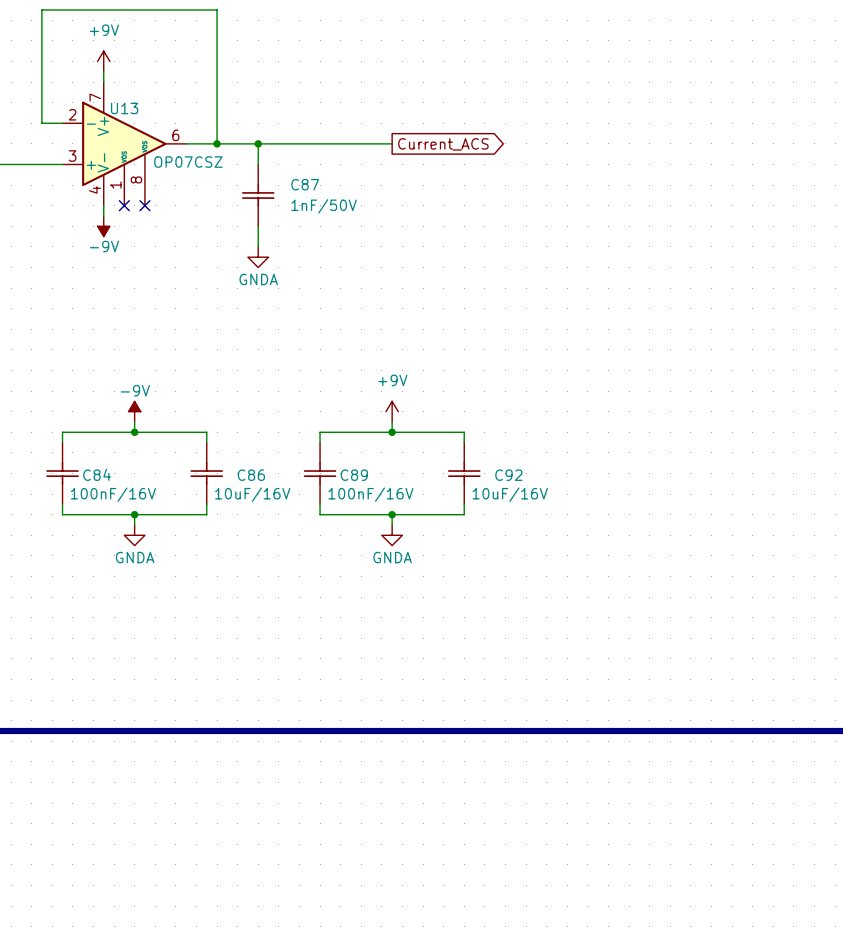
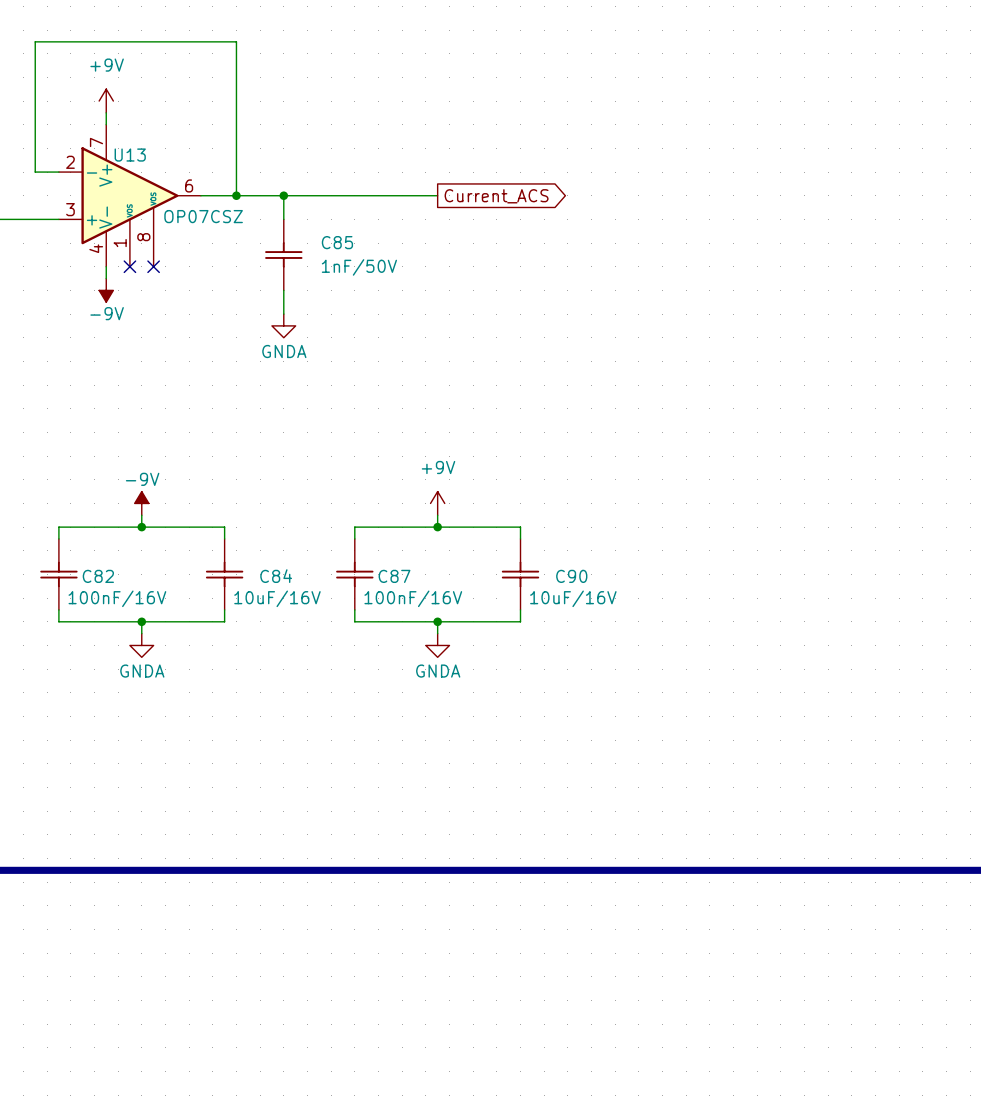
C87 name: C87 (305, 184) -> C85 (337, 242)
C84 name: C84 (97, 474) -> C82 (98, 576)
C86 name: C86 (251, 475) -> C84 (276, 576)
C89 name: C89 (354, 475) -> C87 (394, 576)
C92 name: C92 (508, 475) -> C90 (571, 576)

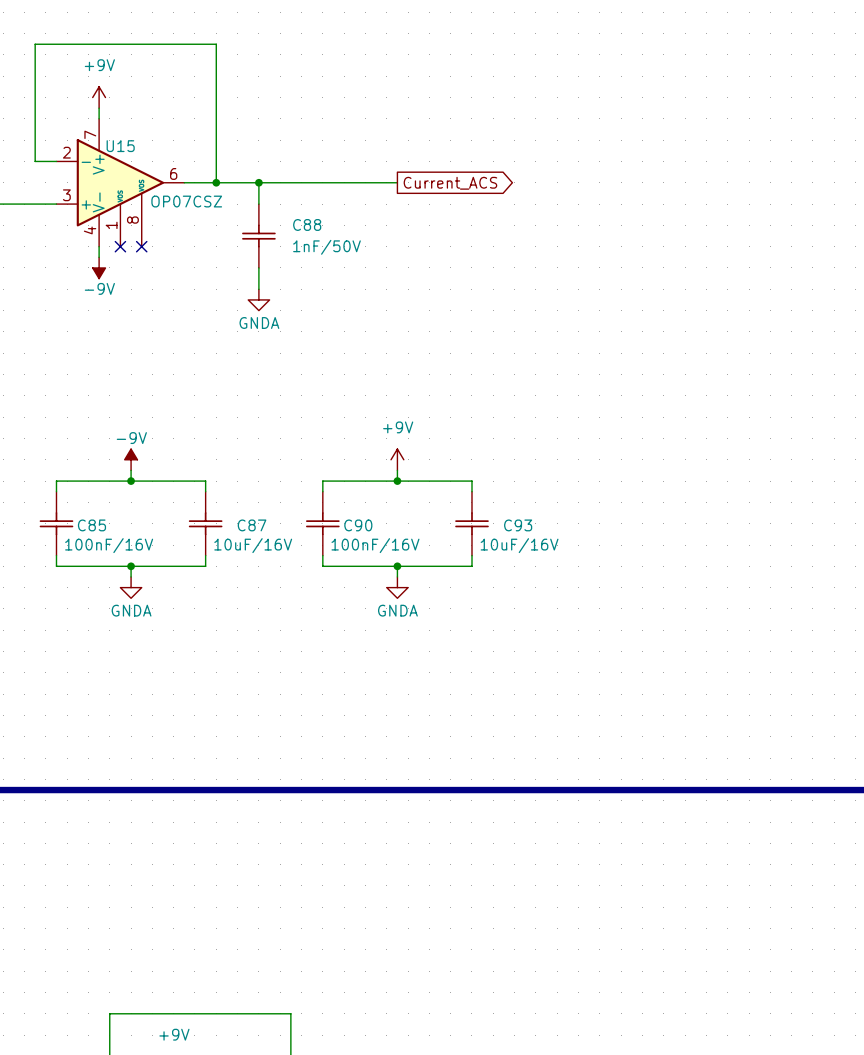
U13 name: U13 (130, 155) -> U15 (120, 146)
C85 name: C85 (337, 242) -> C88 (307, 224)
C82 name: C82 (98, 576) -> C85 (91, 525)
C84 name: C84 (276, 576) -> C87 (252, 525)
C87 name: C87 (394, 576) -> C90 (358, 525)
C90 name: C90 (571, 576) -> C93 (518, 525)

